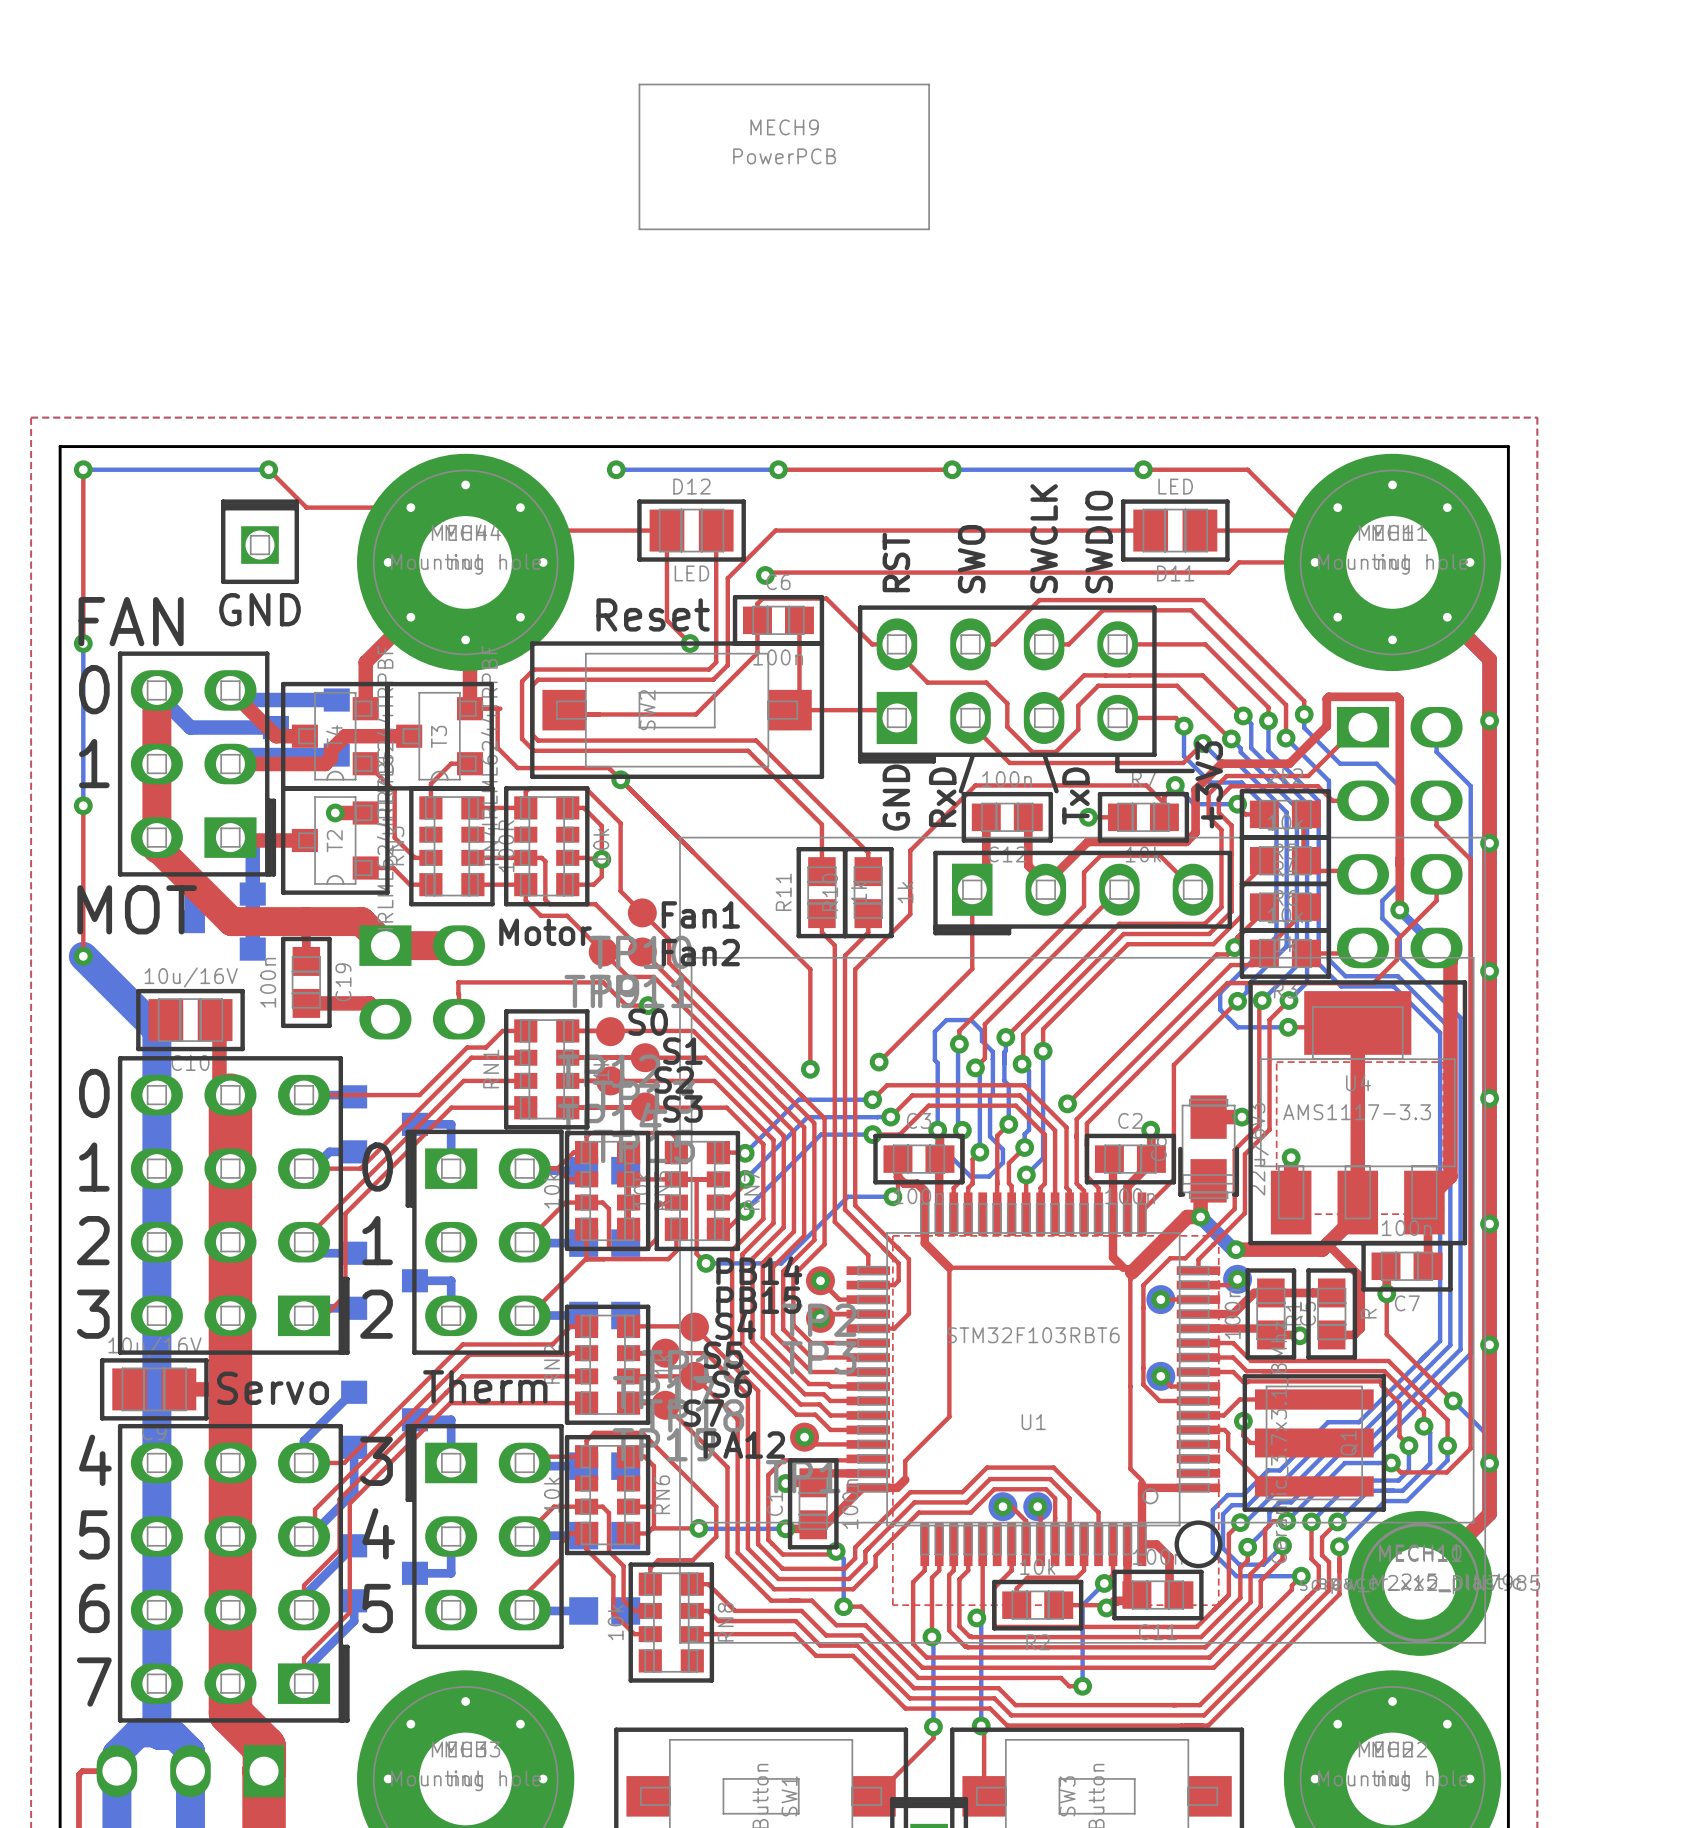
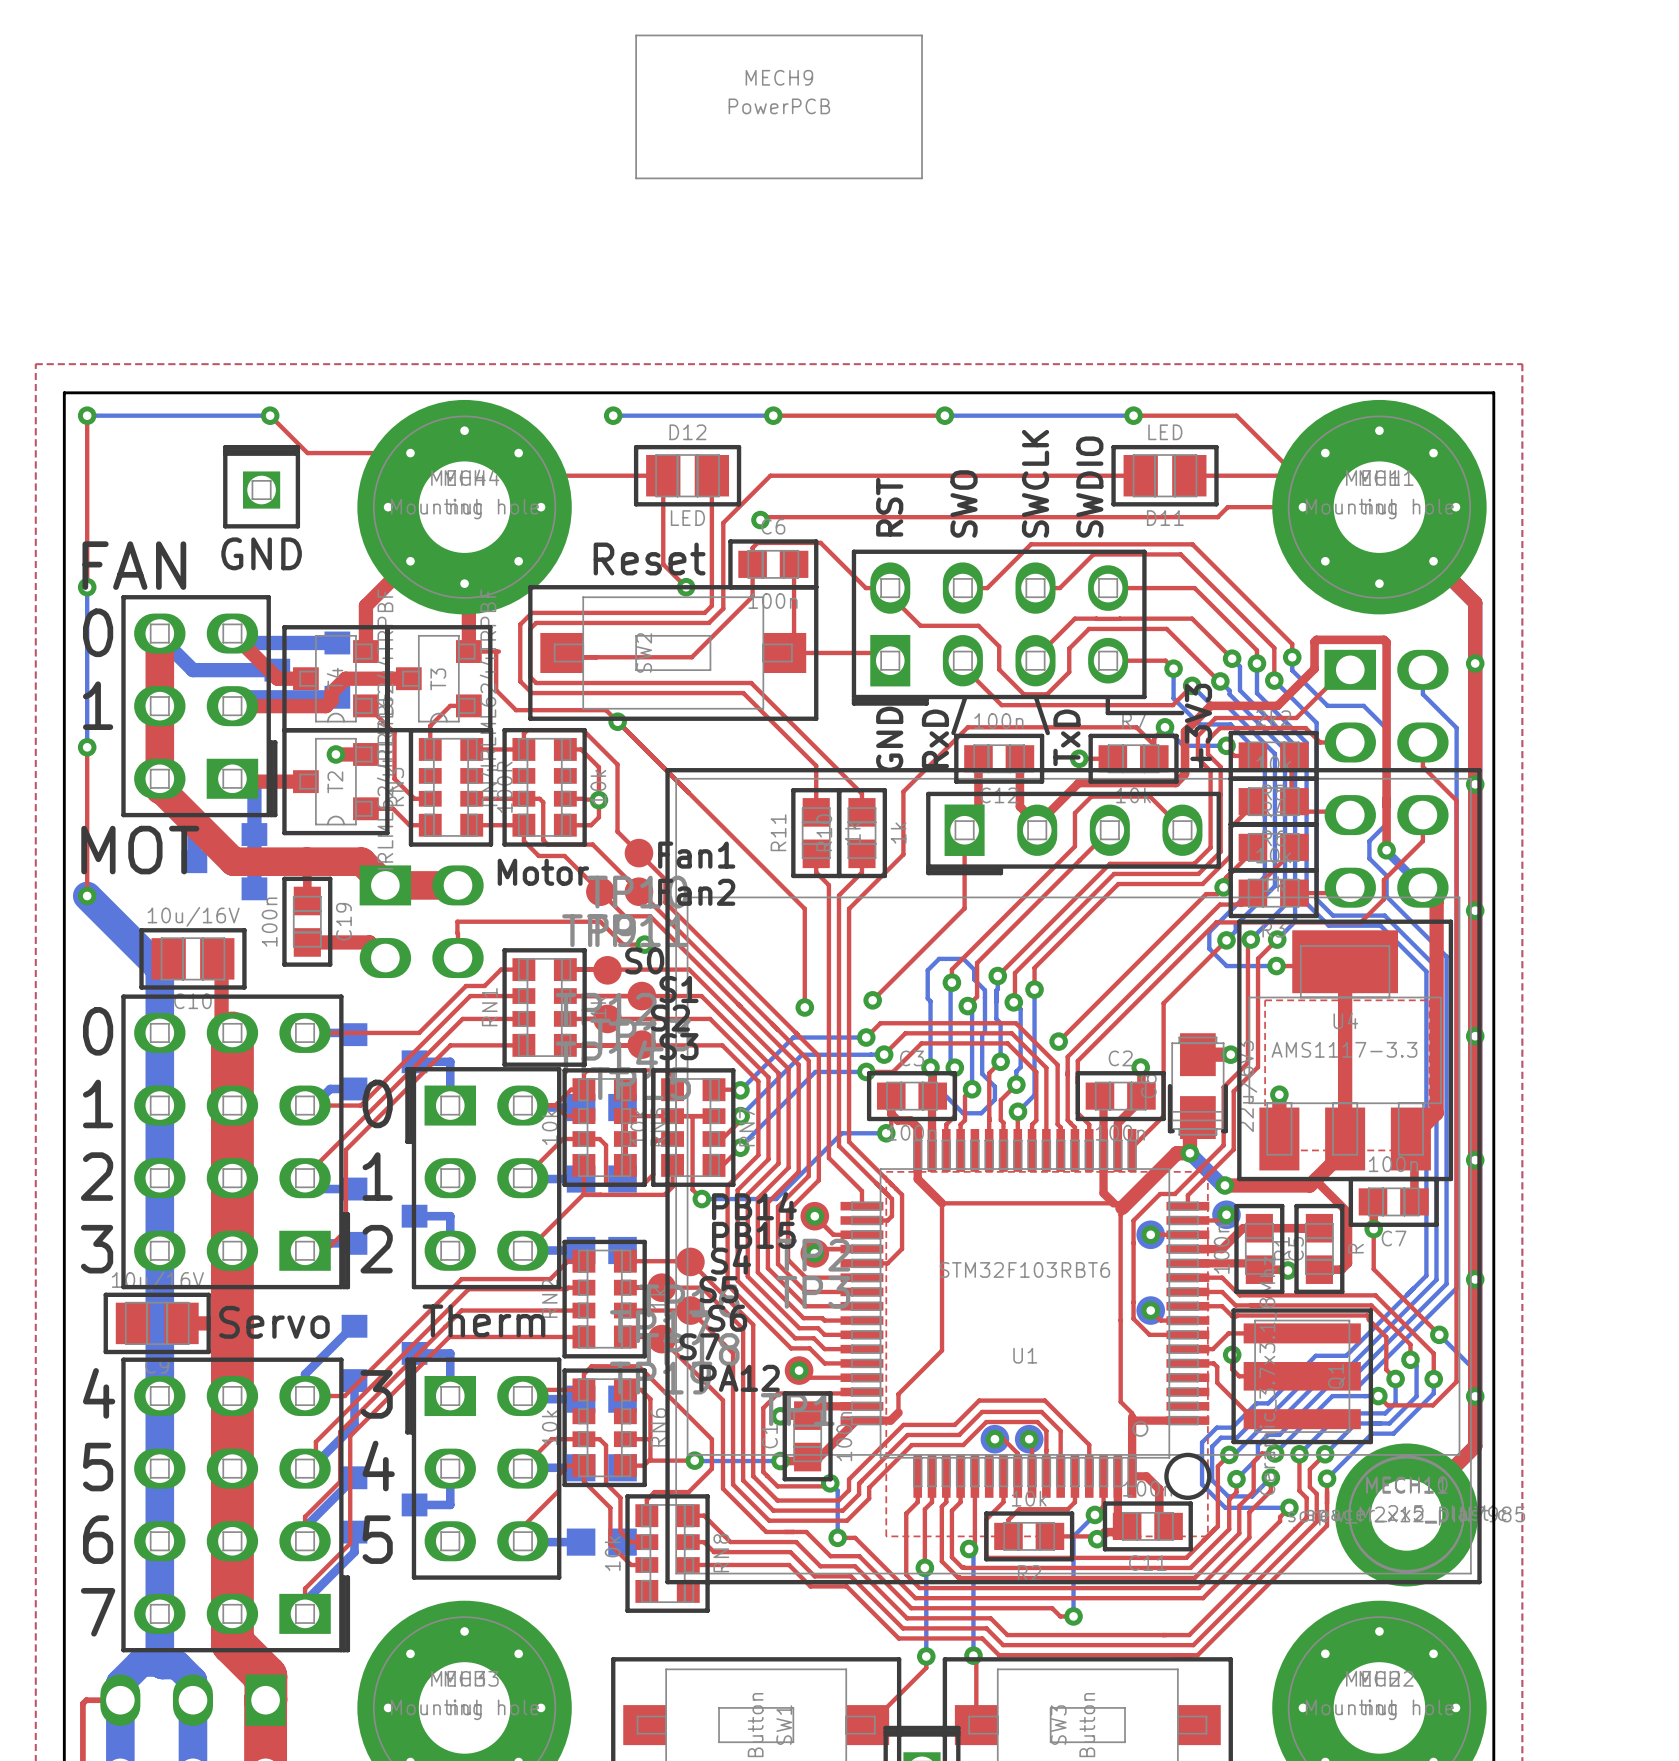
part footprint: [679, 836, 1493, 1656] -> [665, 768, 1482, 1587]

